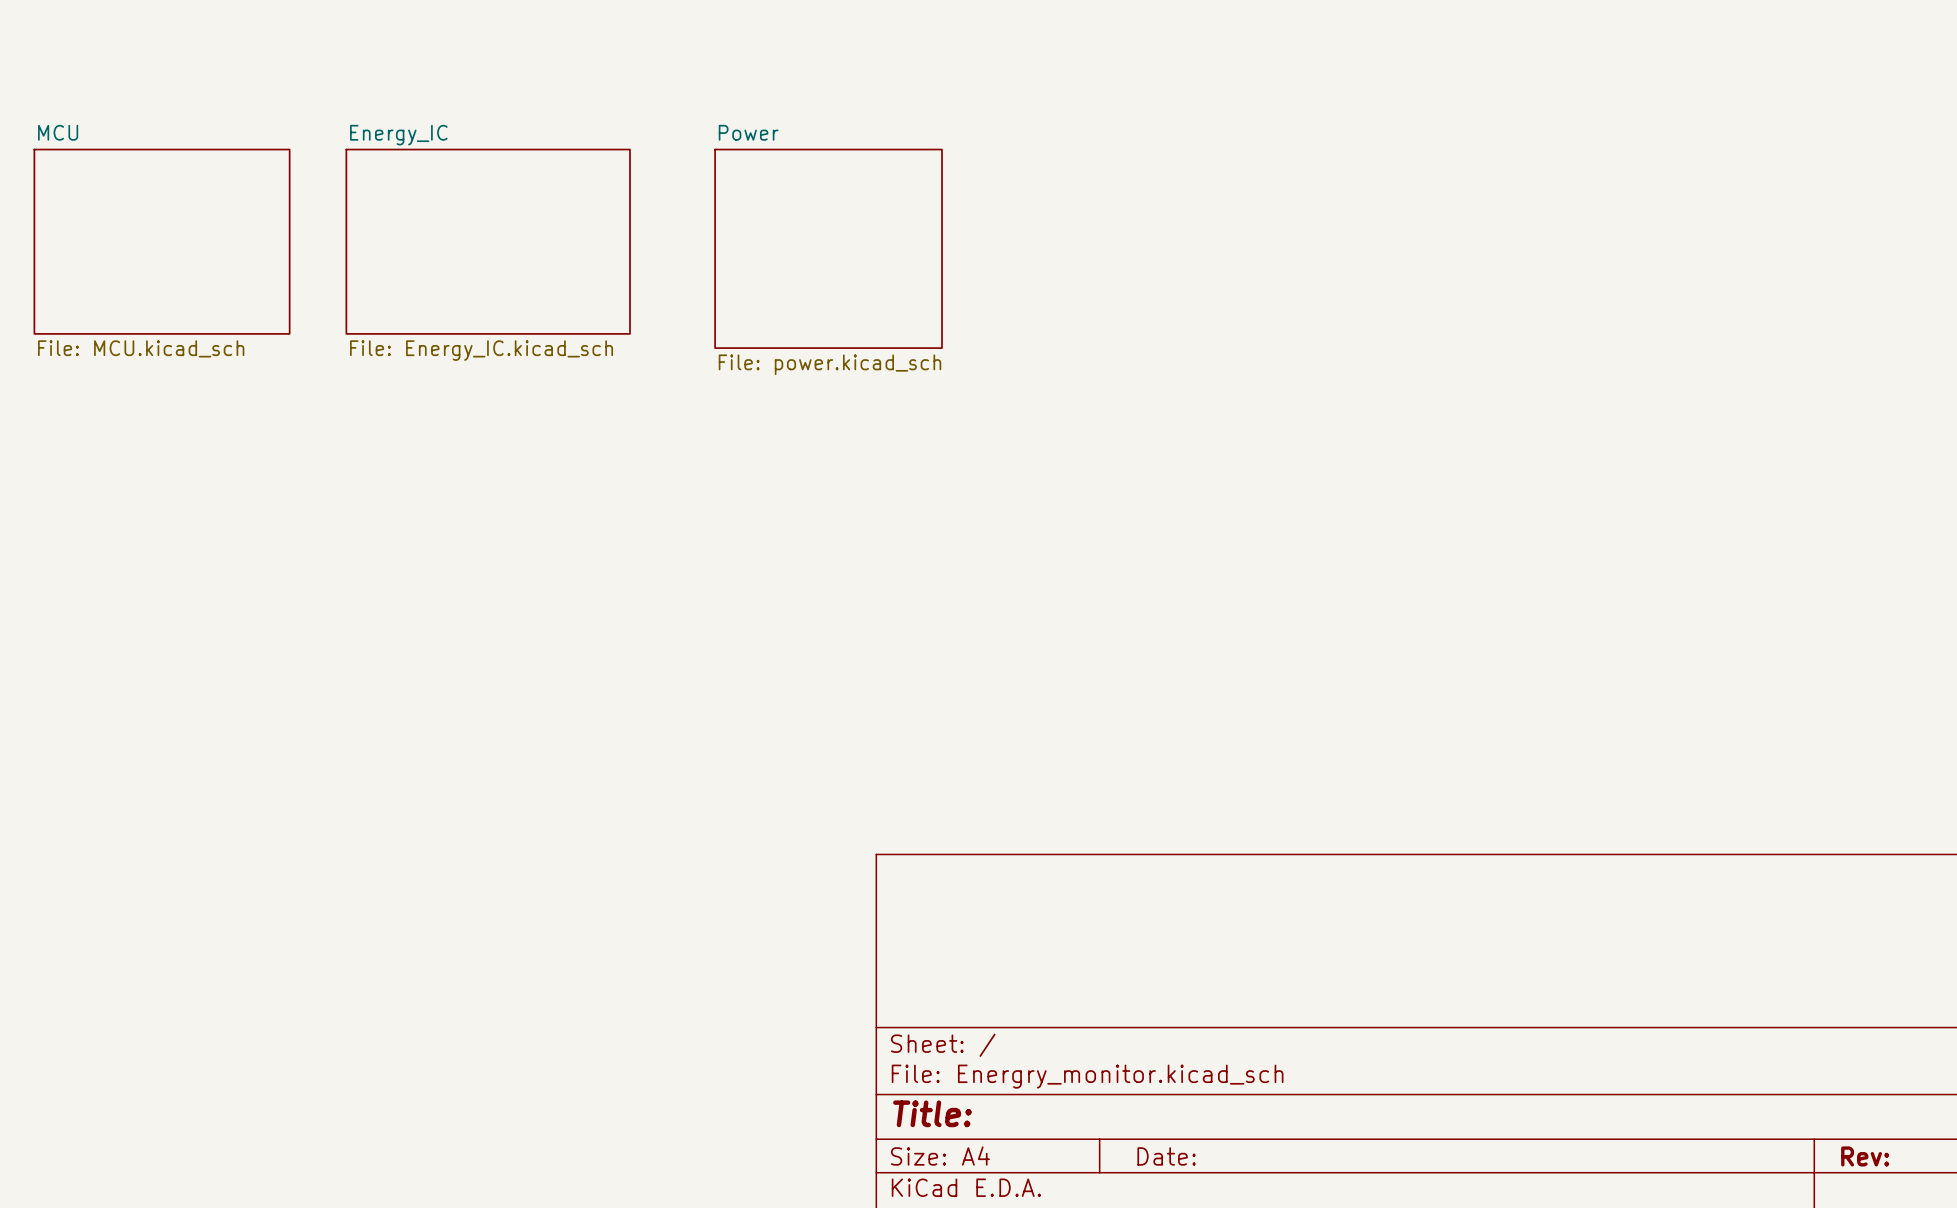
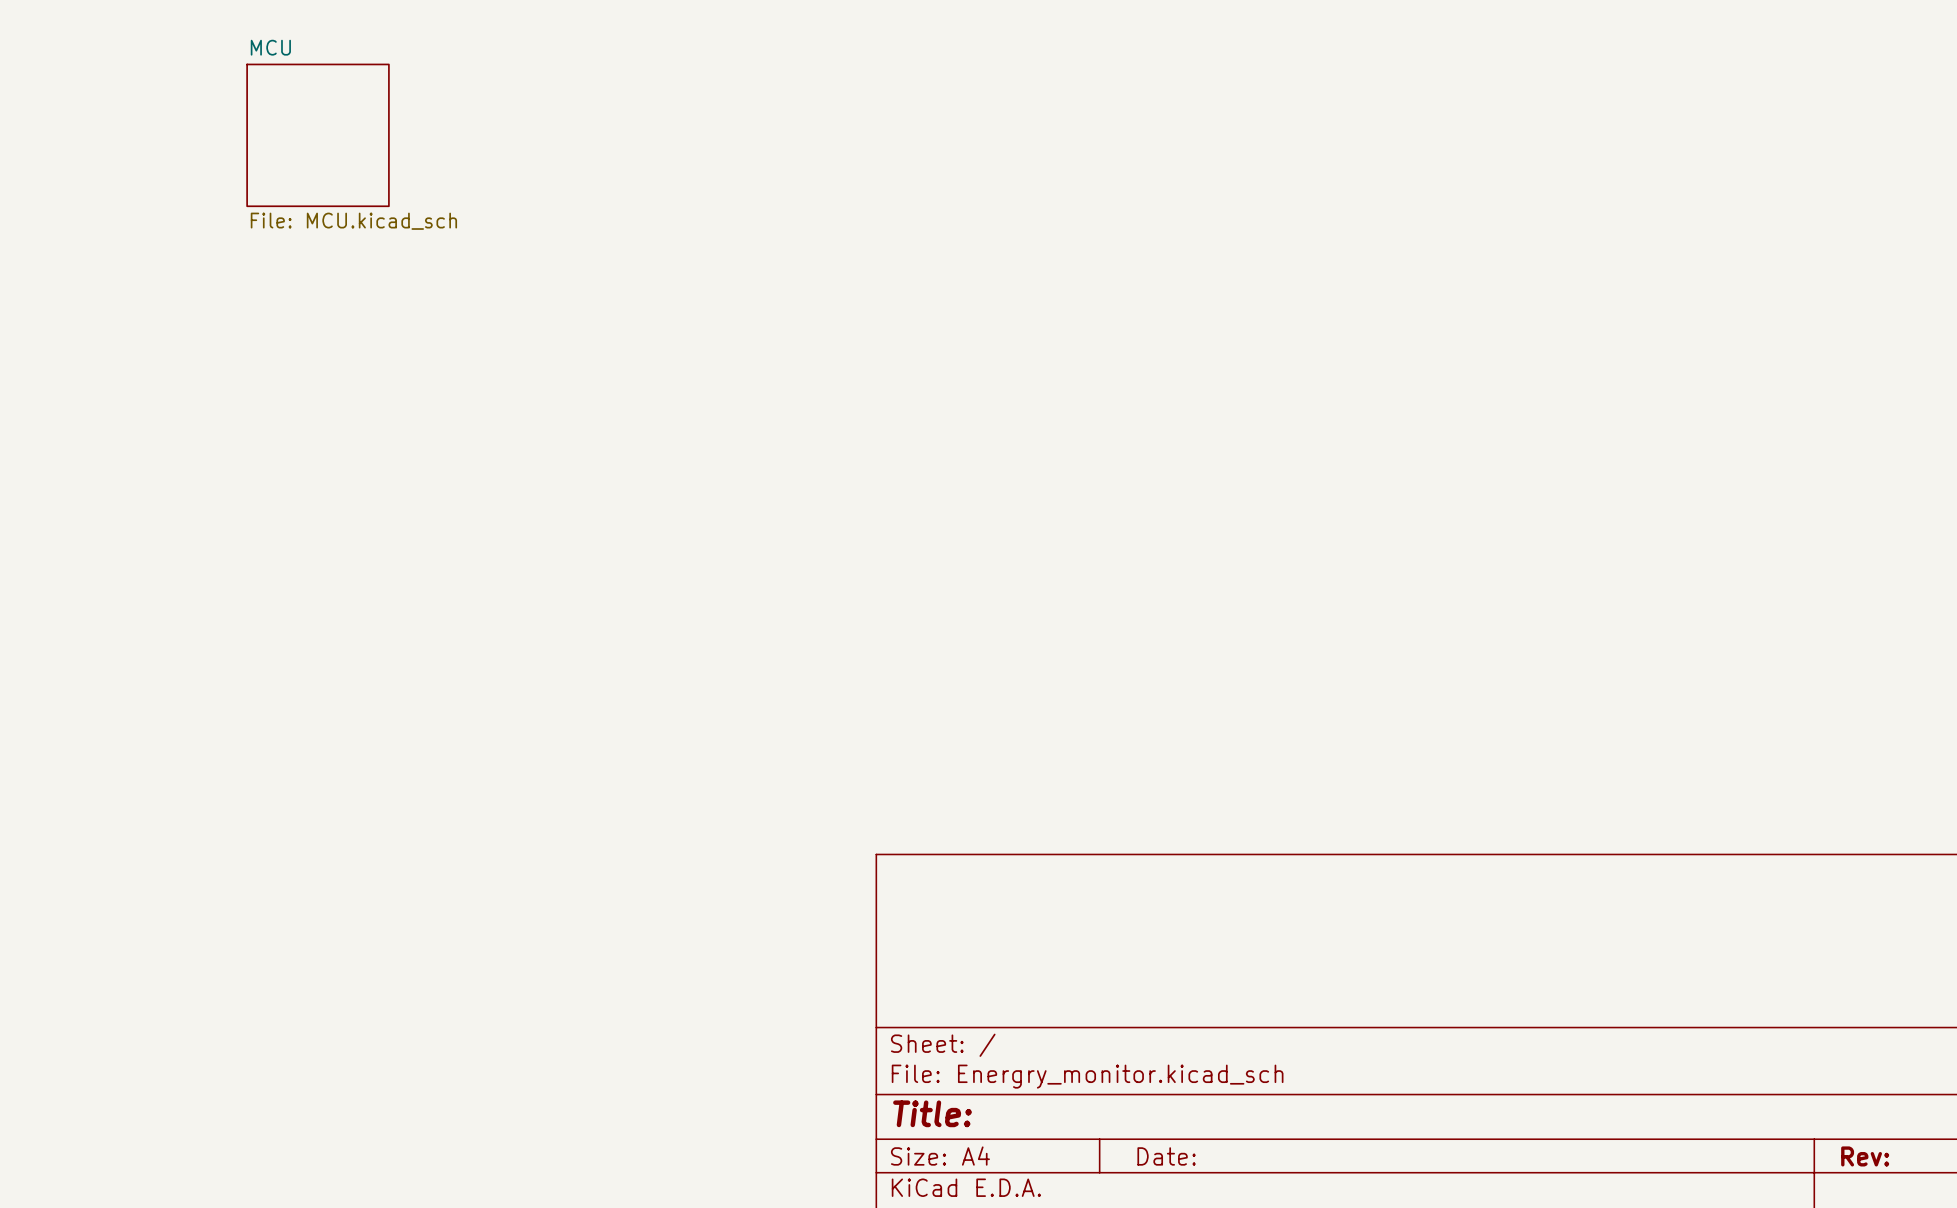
sheet MCU: none -> File: MCU.kicad_sch (318, 135)
sheet MCU: File: MCU.kicad_sch (162, 241) -> none
sheet Energy_IC: File: Energy_IC.kicad_sch (488, 241) -> none
sheet Power: File: power.kicad_sch (828, 248) -> none

